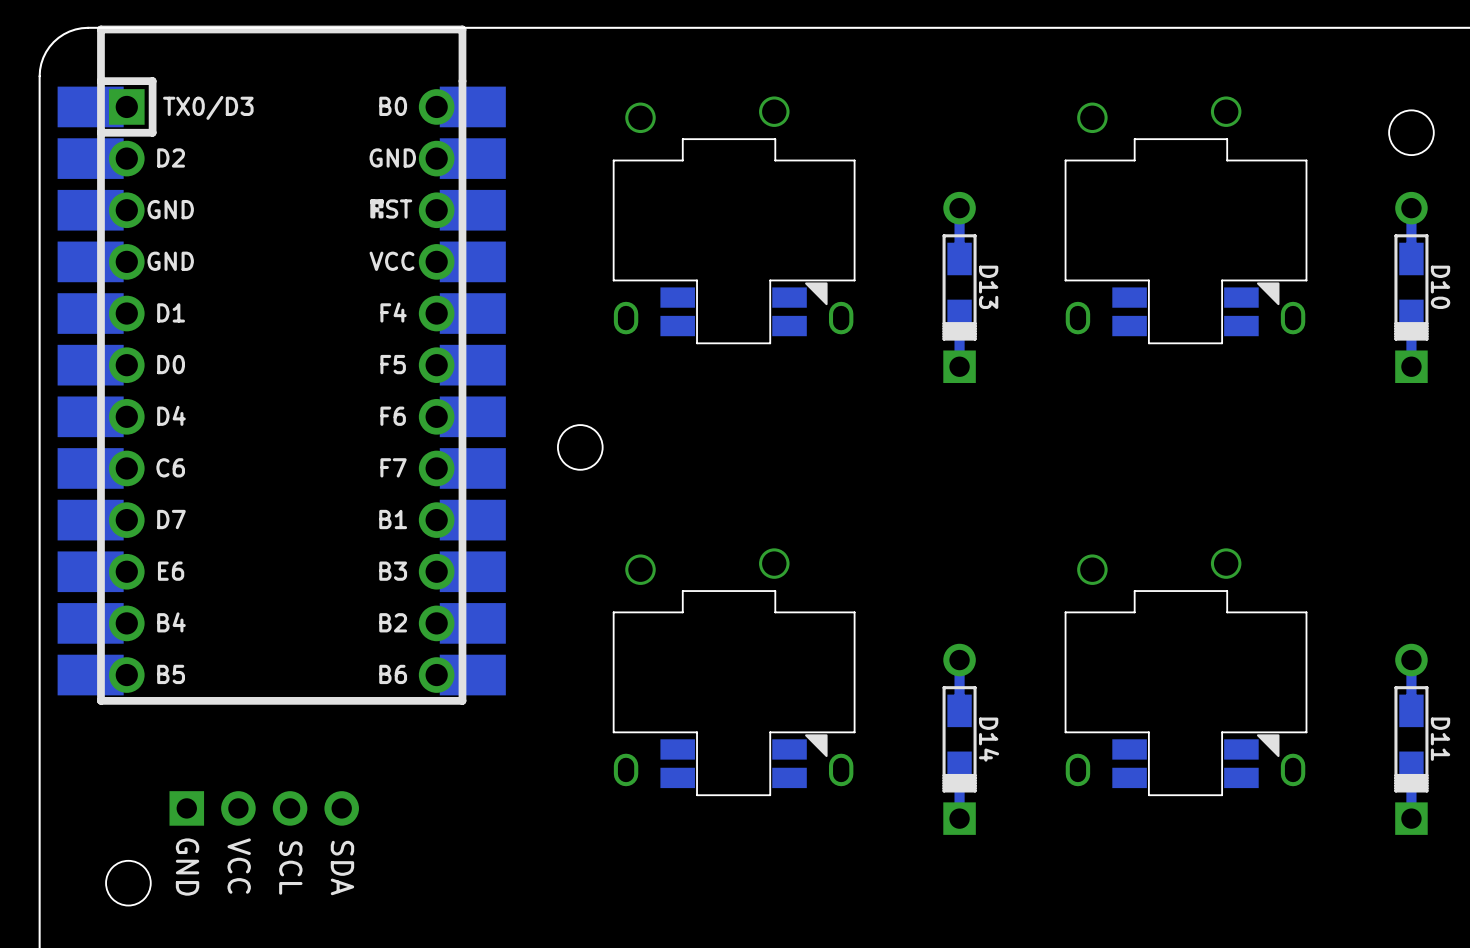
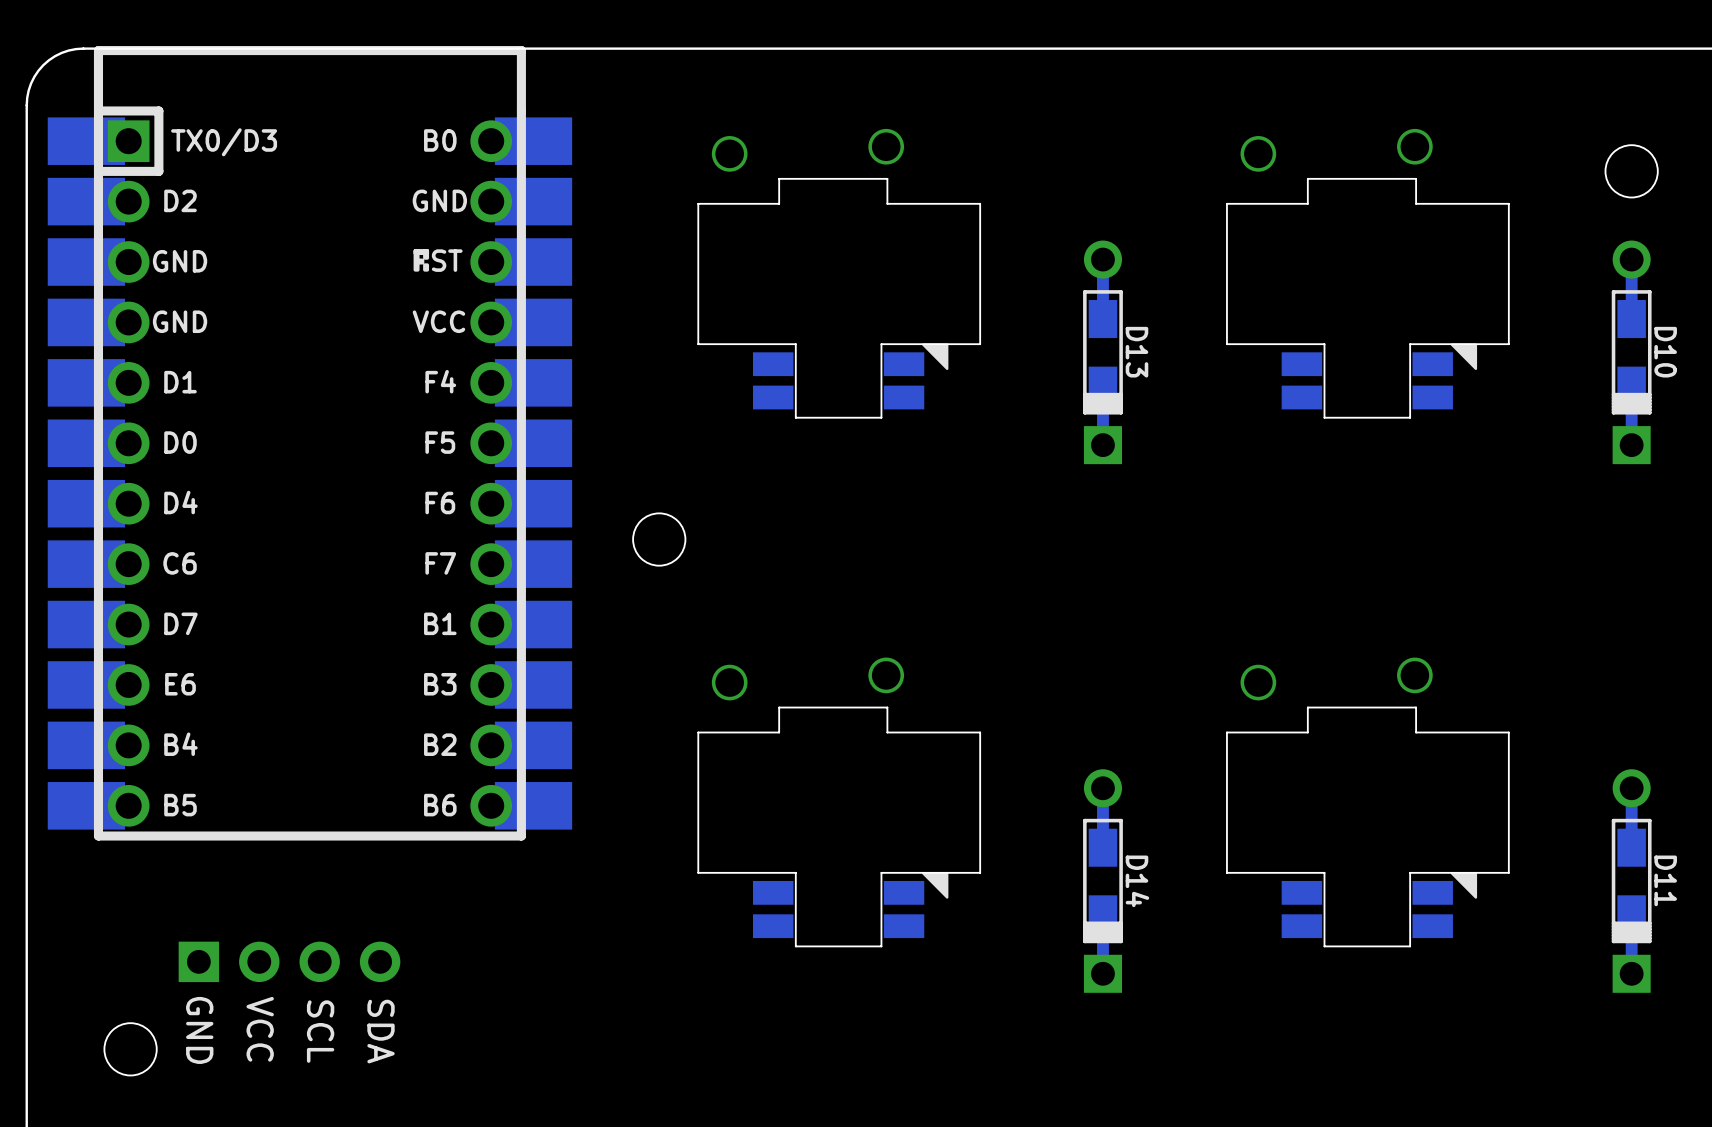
part footprint: [613, 96, 856, 344] -> [697, 128, 981, 419]
part footprint: [1065, 96, 1307, 344] -> [1226, 128, 1510, 419]
part footprint: [613, 548, 856, 796] -> [697, 657, 981, 947]
part footprint: [1065, 548, 1307, 796] -> [1226, 657, 1510, 947]

